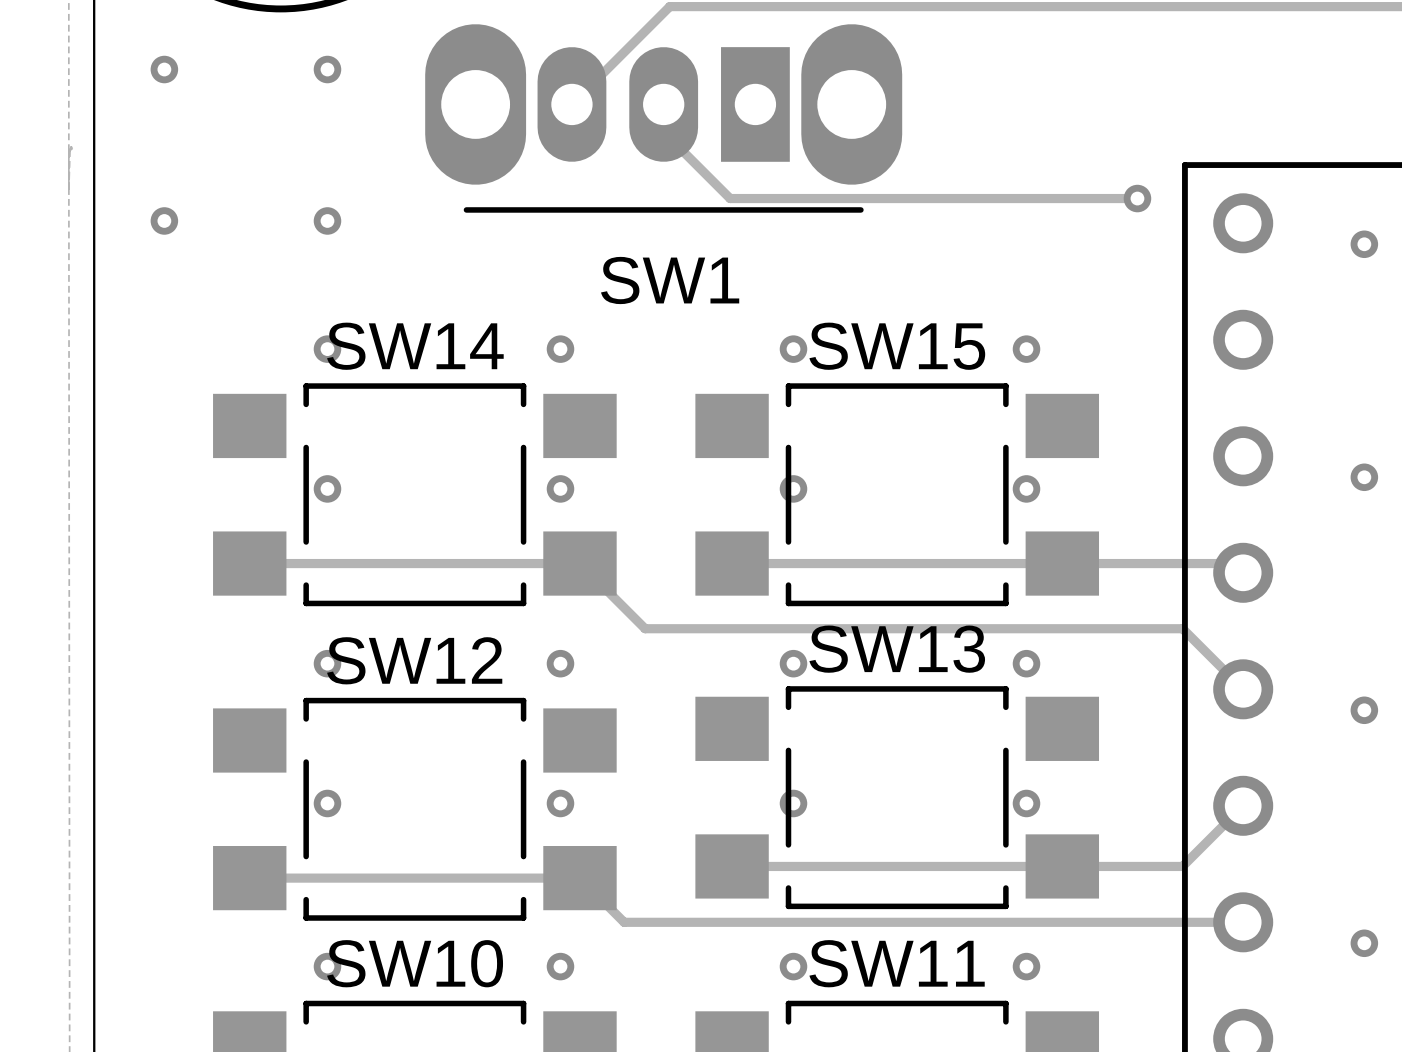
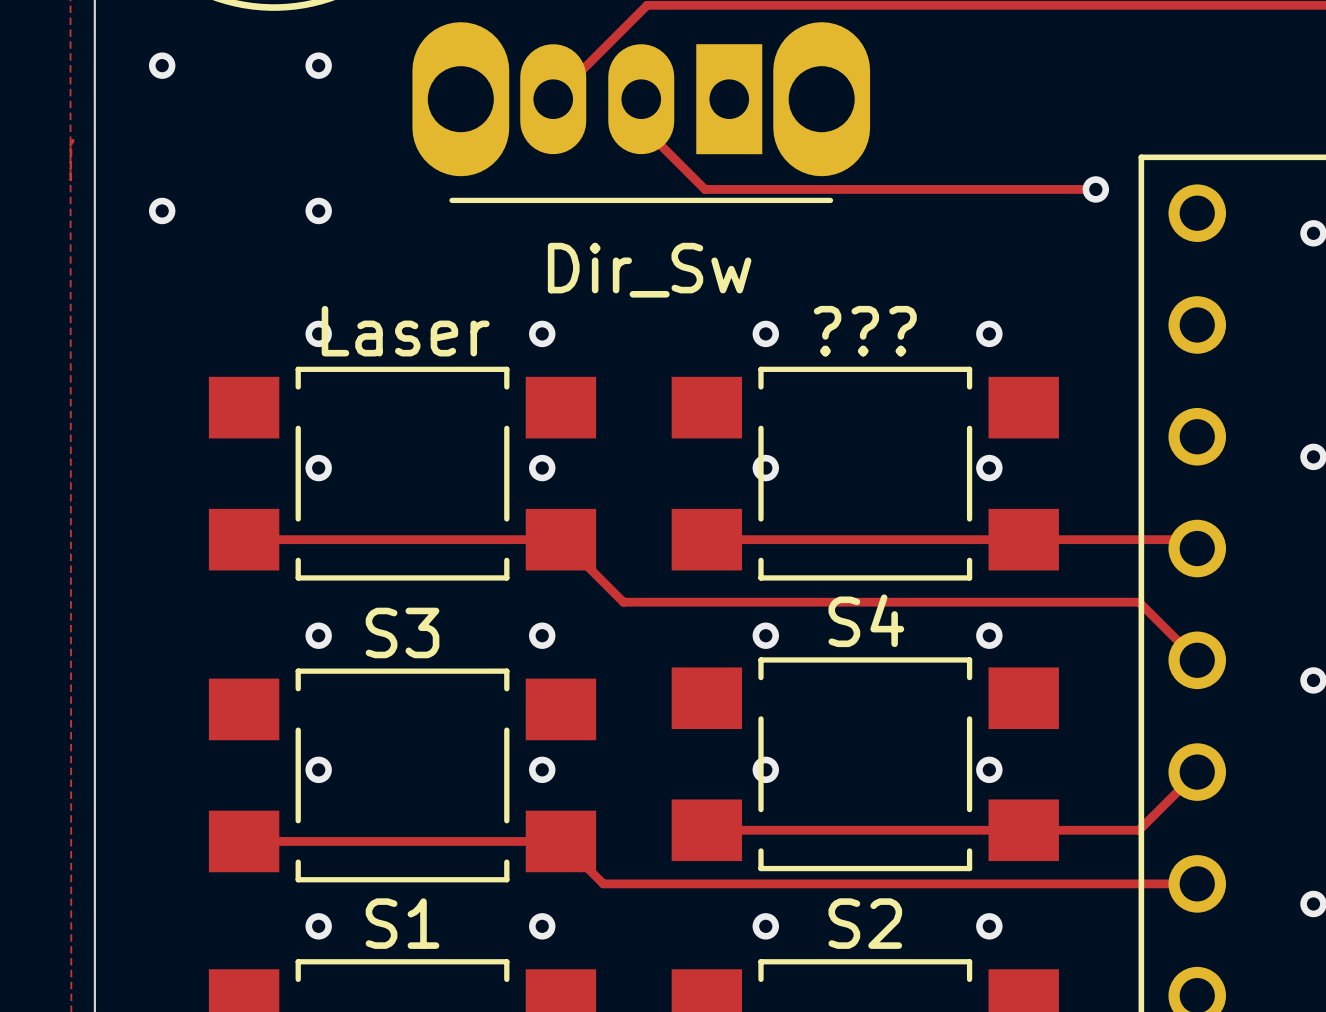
SW1 name: SW1 (670, 280) -> Dir_Sw (649, 270)
SW14 name: SW14 (415, 346) -> Laser (405, 331)
SW15 name: SW15 (897, 346) -> ??? (865, 331)
SW13 name: SW13 (897, 649) -> S4 (866, 620)
SW12 name: SW12 (414, 660) -> S3 (402, 632)
SW10 name: SW10 (415, 963) -> S1 (402, 923)
SW11 name: SW11 (897, 963) -> S2 (865, 923)

